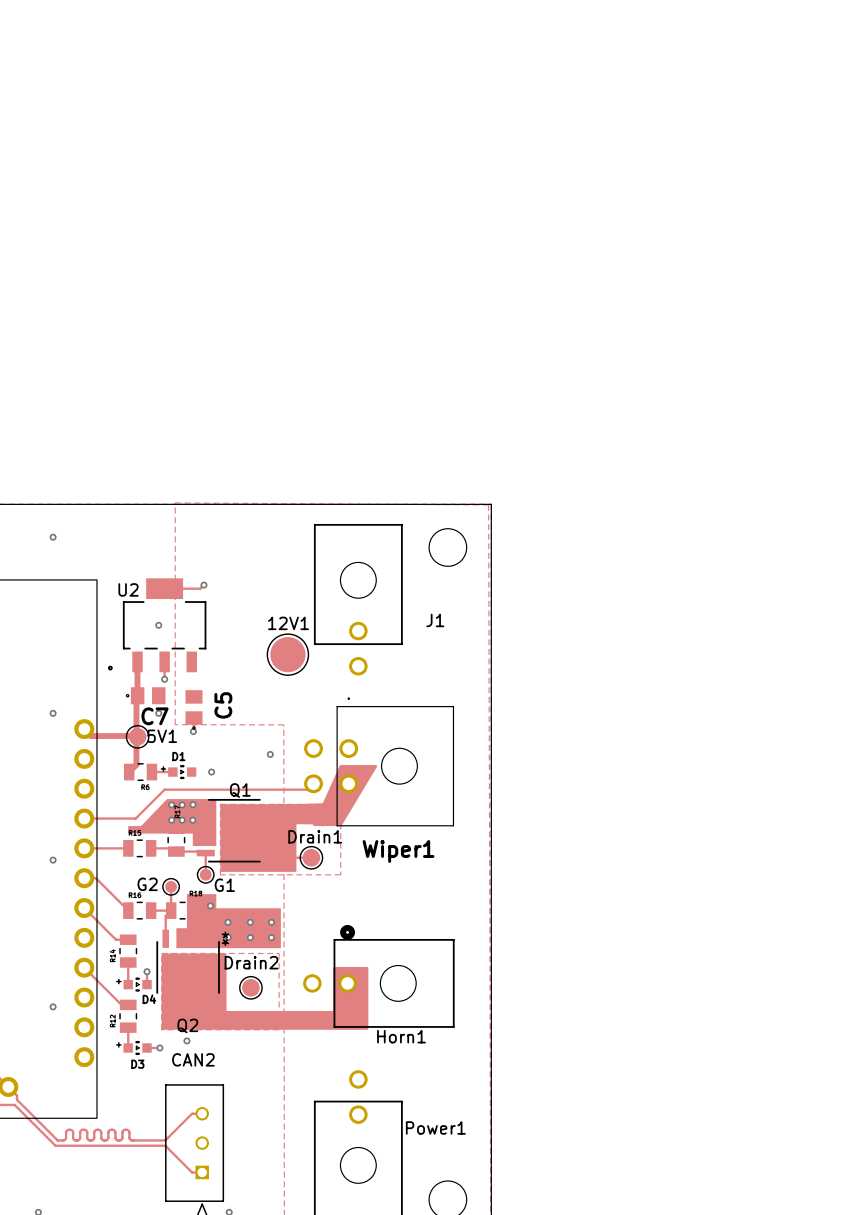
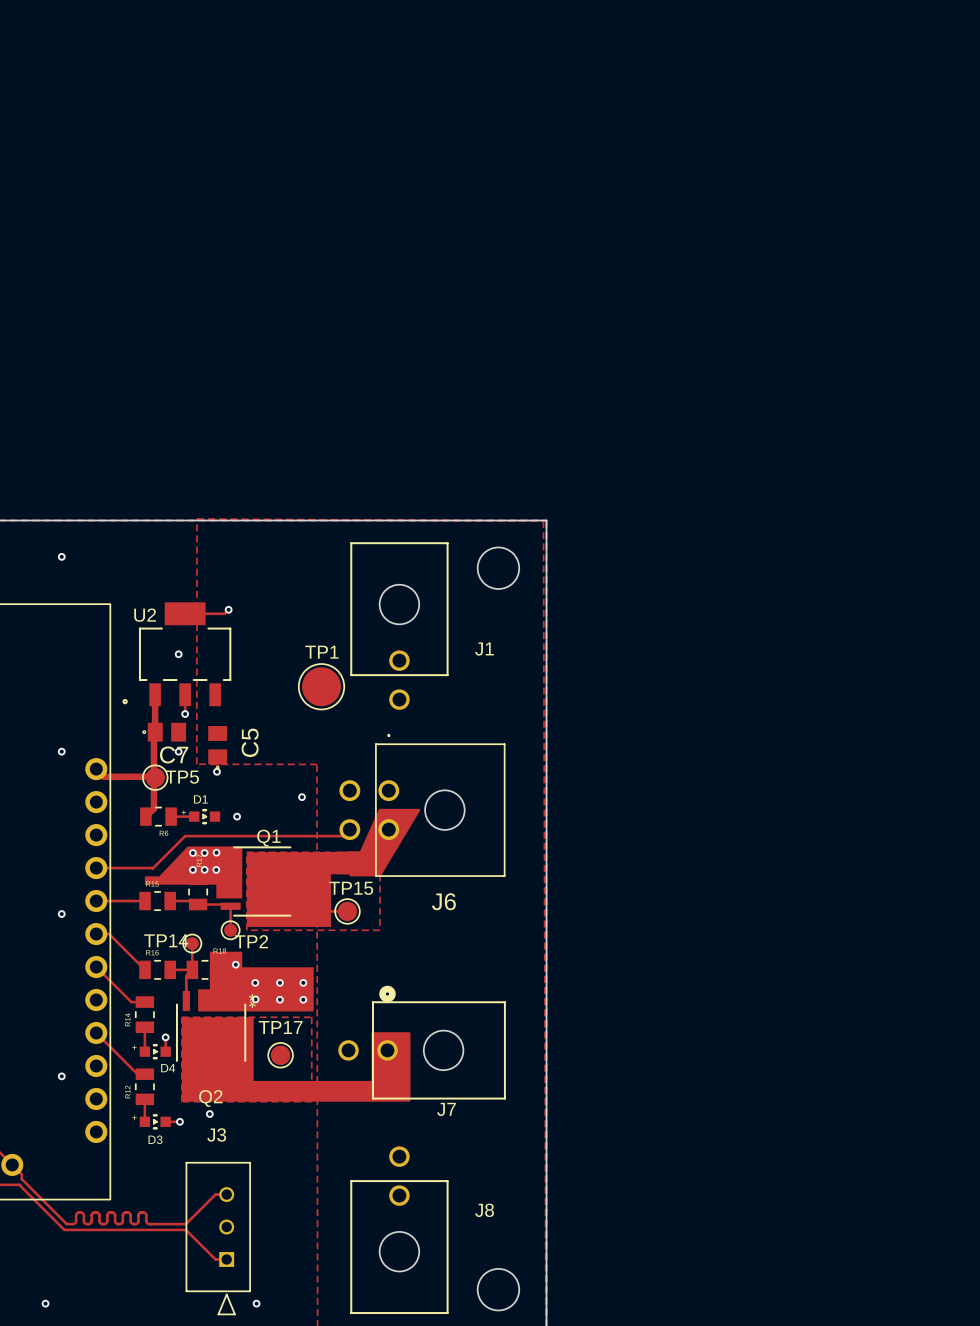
12V1 name: 12V1 (288, 623) -> TP1 (321, 652)
5V1 name: 5V1 (162, 736) -> TP5 (182, 777)
Drain1 name: Drain1 (315, 836) -> TP15 (351, 888)
Wiper1 name: Wiper1 (398, 851) -> J6 (443, 901)
G2 name: G2 (147, 884) -> TP14 (166, 940)
G1 name: G1 (224, 885) -> TP2 (251, 941)
Drain2 name: Drain2 (251, 962) -> TP17 (280, 1027)
Horn1 name: Horn1 (401, 1036) -> J7 (446, 1109)
CAN2 name: CAN2 (193, 1059) -> J3 (216, 1134)
Power1 name: Power1 (435, 1127) -> J8 (484, 1210)

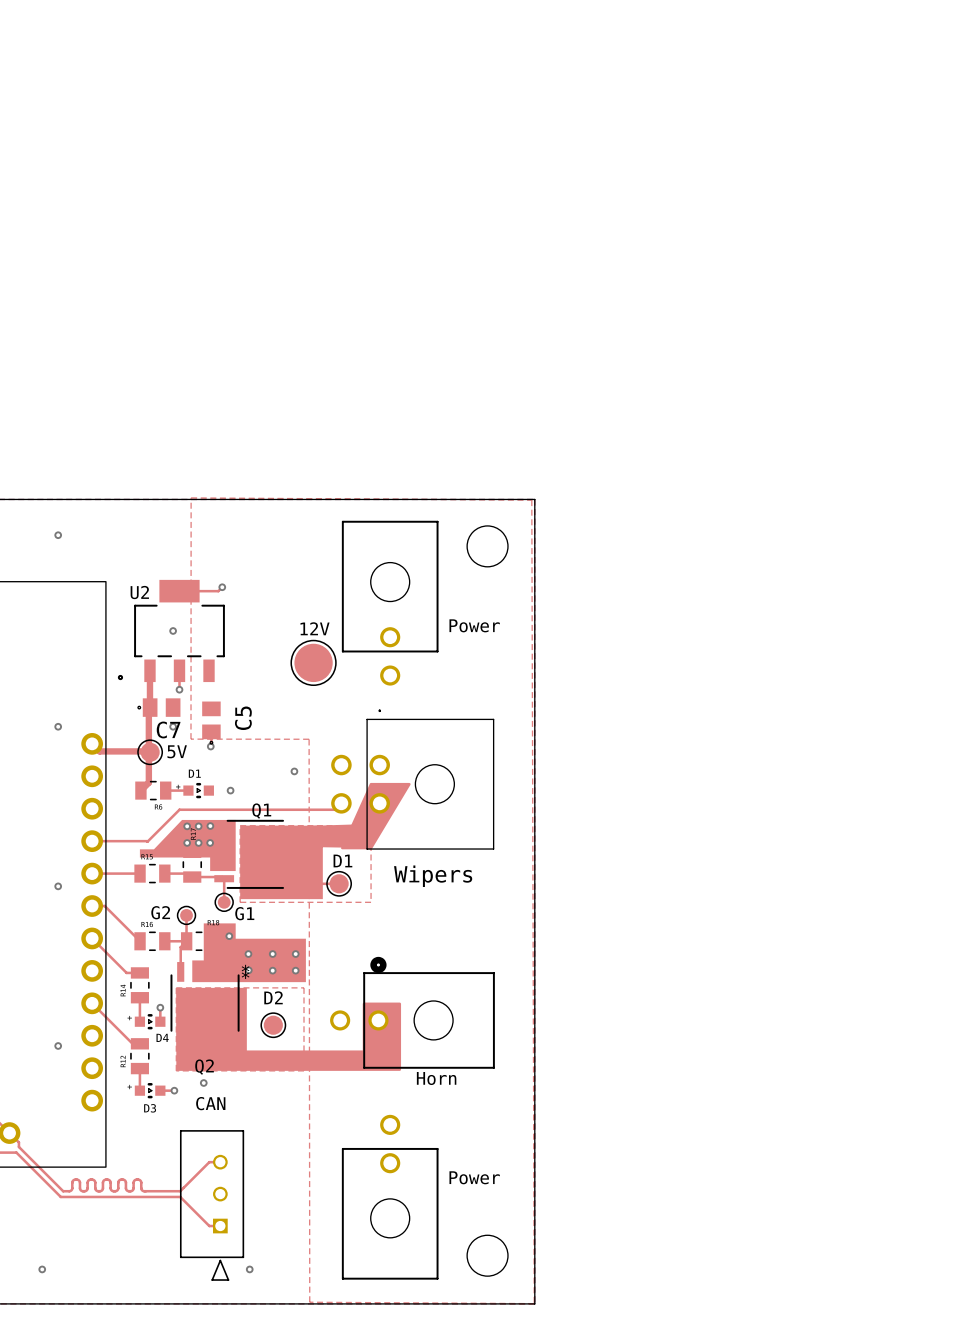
J1 name: J1 (484, 649) -> Power (474, 625)
TP1 name: TP1 (321, 652) -> 12V (315, 628)
TP5 name: TP5 (182, 777) -> 5V (177, 751)
TP15 name: TP15 (351, 888) -> D1 (342, 860)
J6 name: J6 (443, 901) -> Wipers (433, 876)
TP14 name: TP14 (166, 940) -> G2 (160, 912)
TP2 name: TP2 (251, 941) -> G1 (244, 913)
TP17 name: TP17 (280, 1027) -> D2 (273, 997)
J7 name: J7 (446, 1109) -> Horn (436, 1078)
J3 name: J3 (216, 1134) -> CAN (210, 1103)
J8 name: J8 (484, 1210) -> Power (474, 1177)

